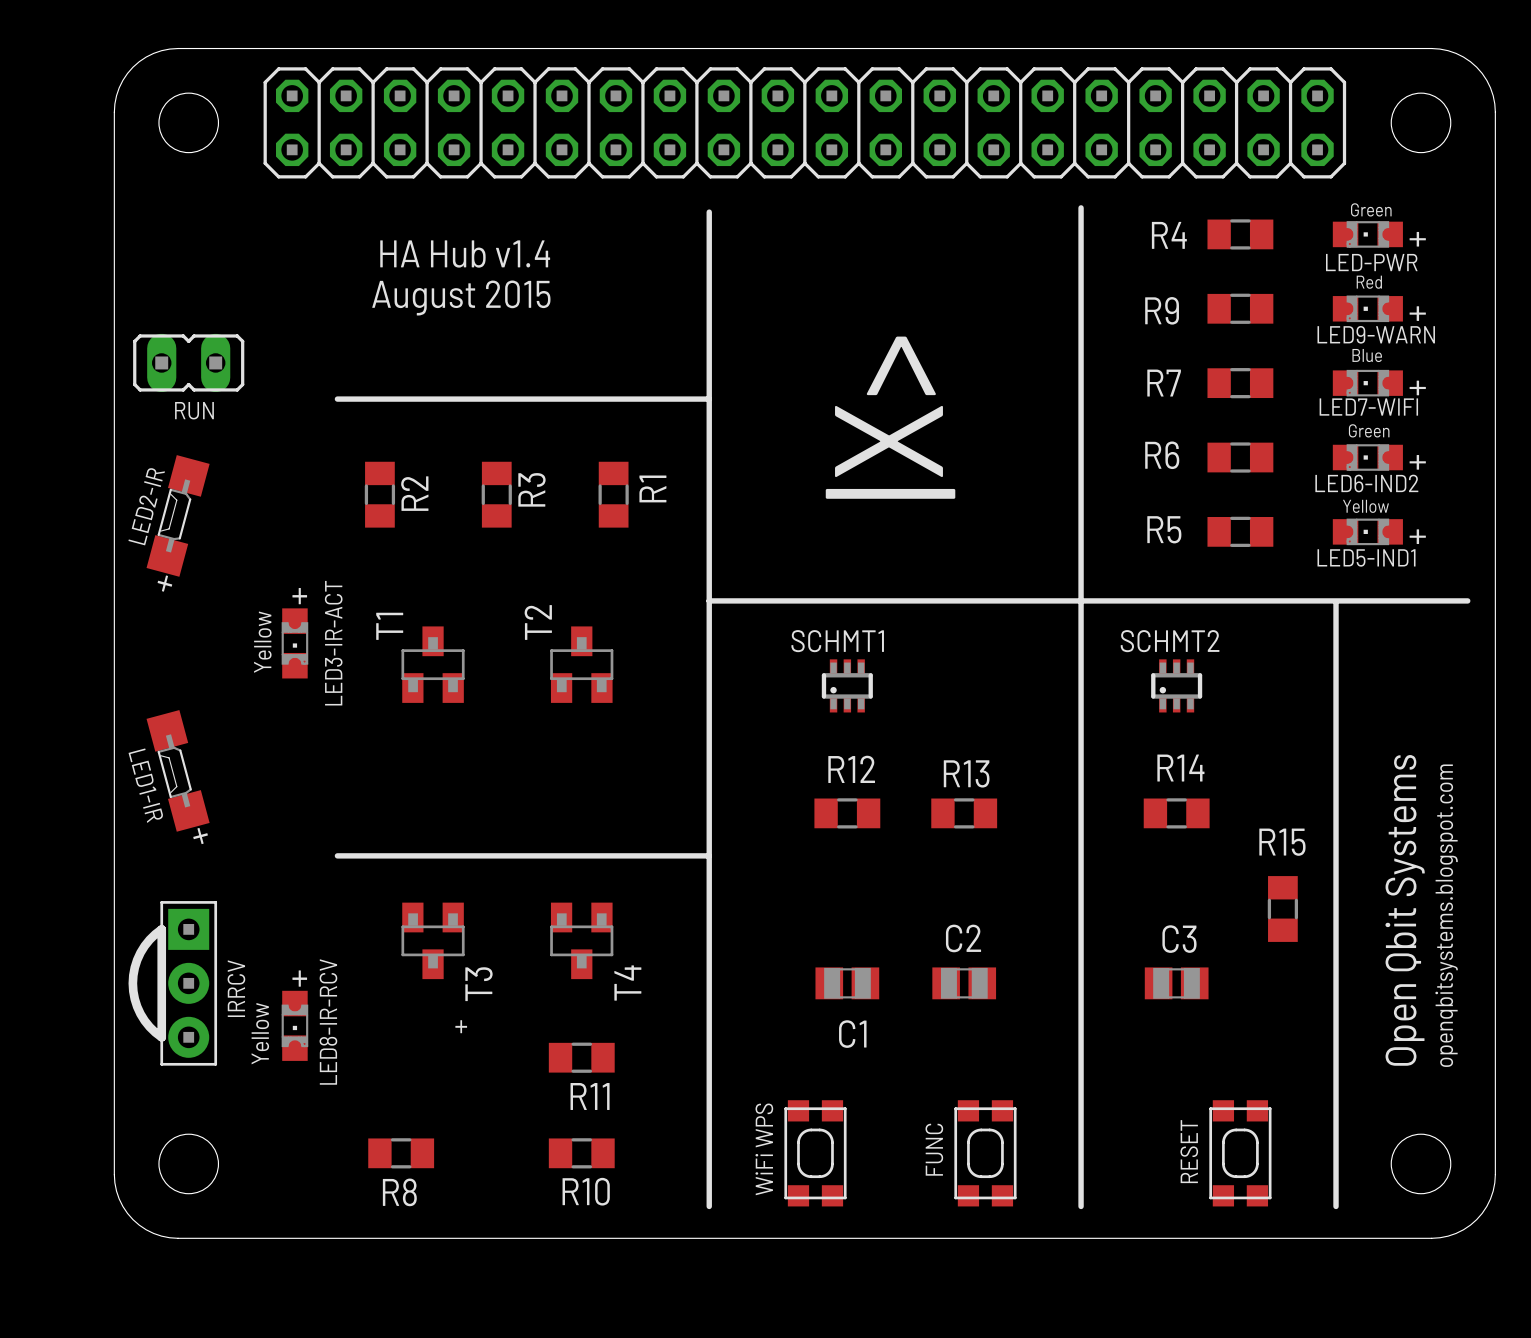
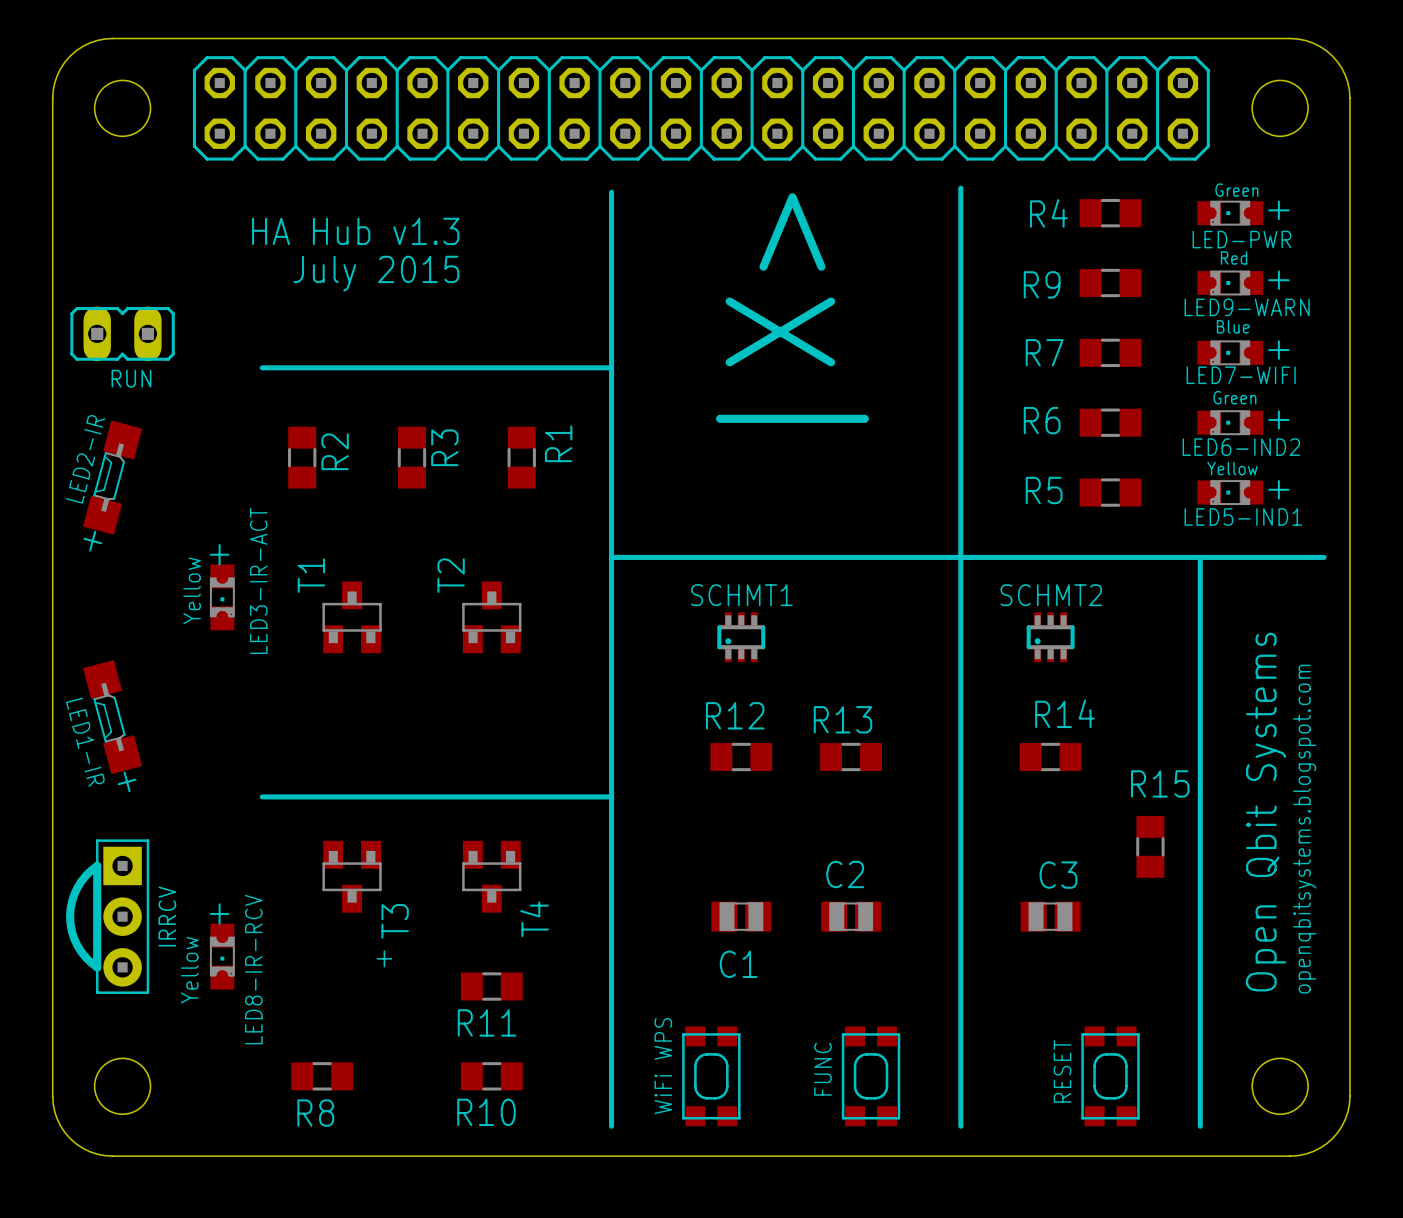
text: HA Hub v1.4 (465, 254) -> HA Hub v1.3 (355, 231)
text: August 2015 (461, 298) -> July 2015 (376, 273)

